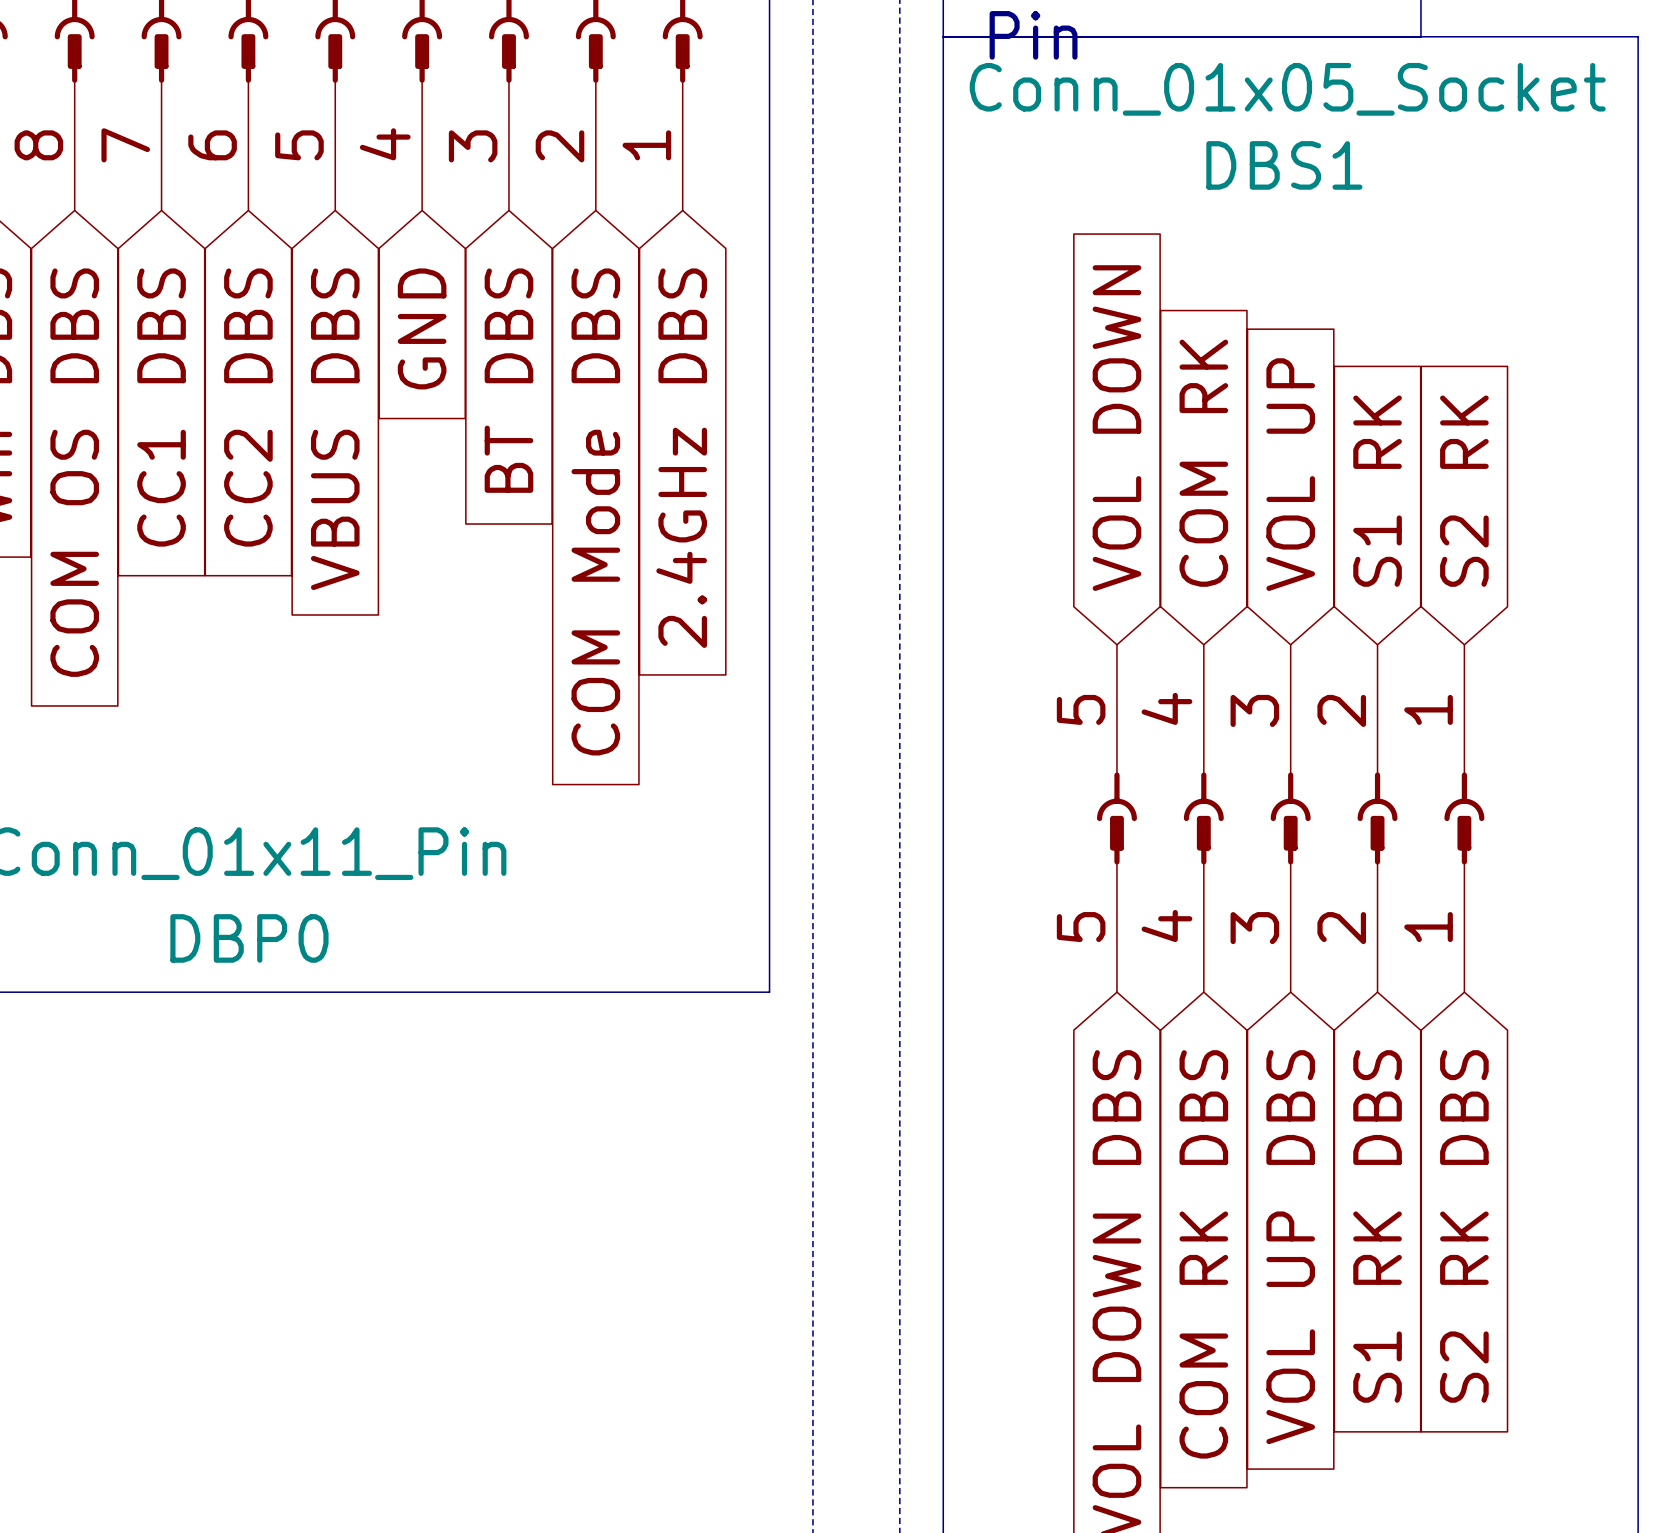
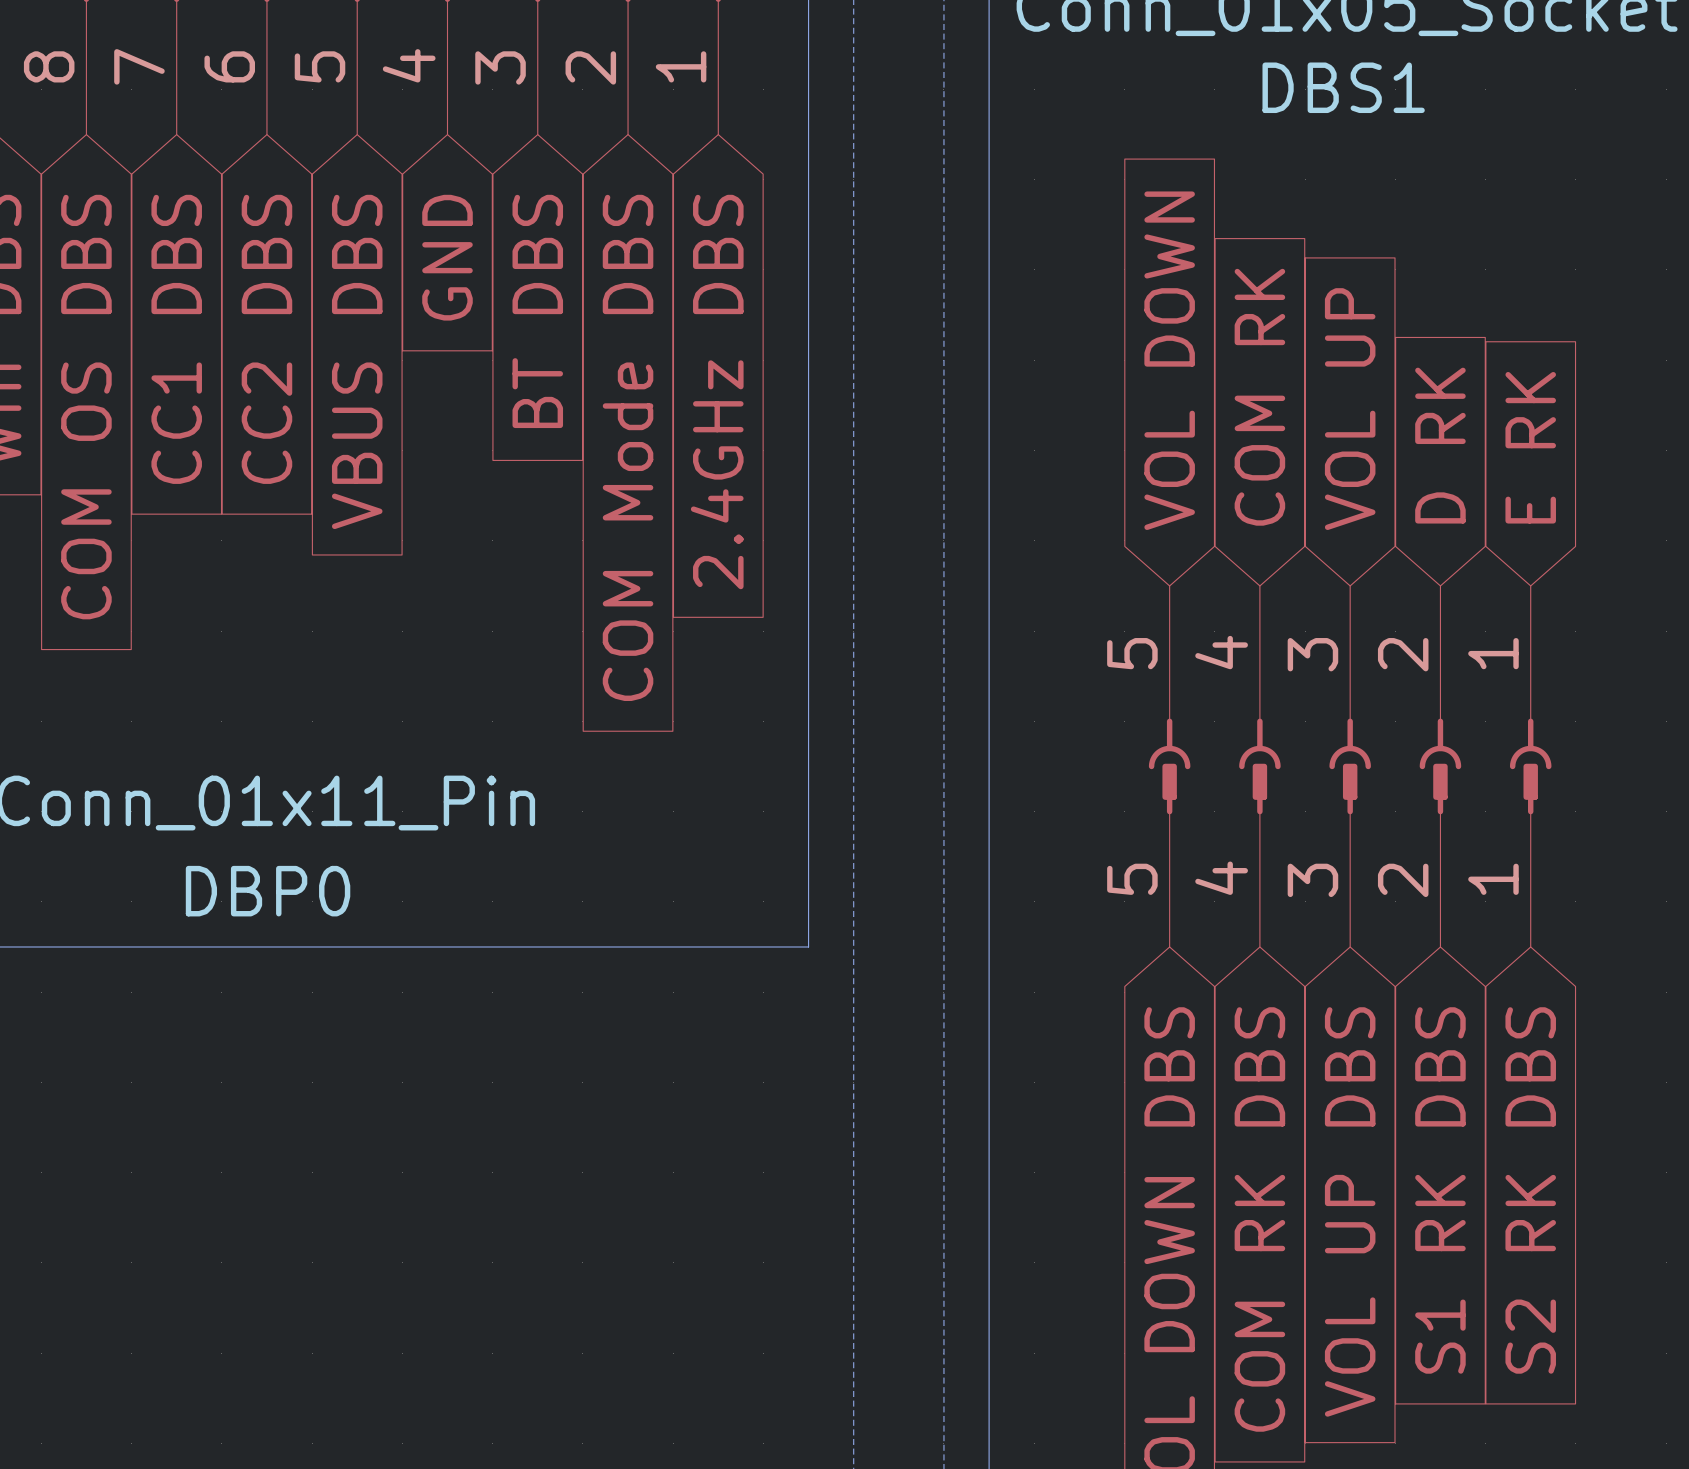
global label: S1 RK (1377, 491) -> D RK (1440, 445)
global label: S2 RK (1464, 491) -> E RK (1530, 447)

